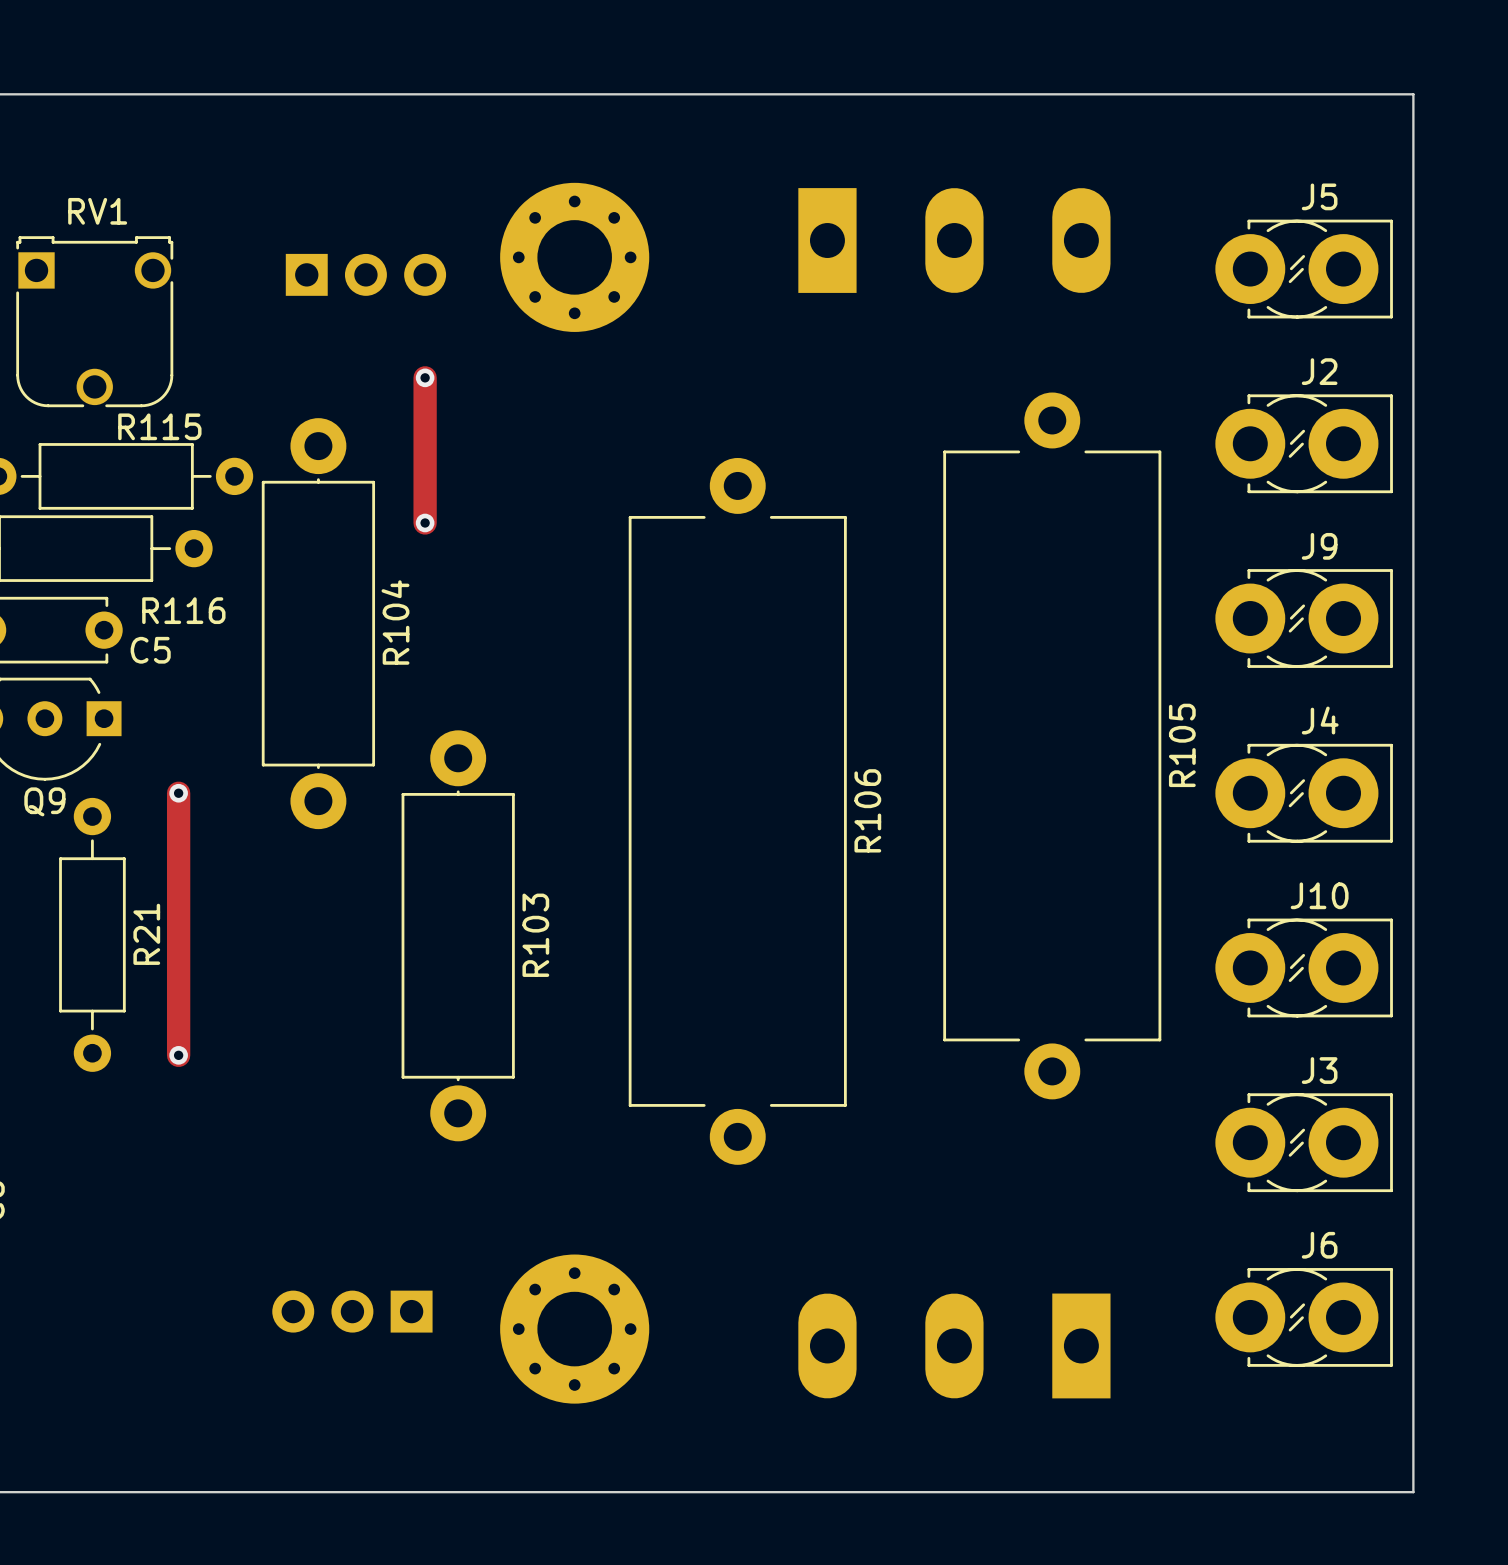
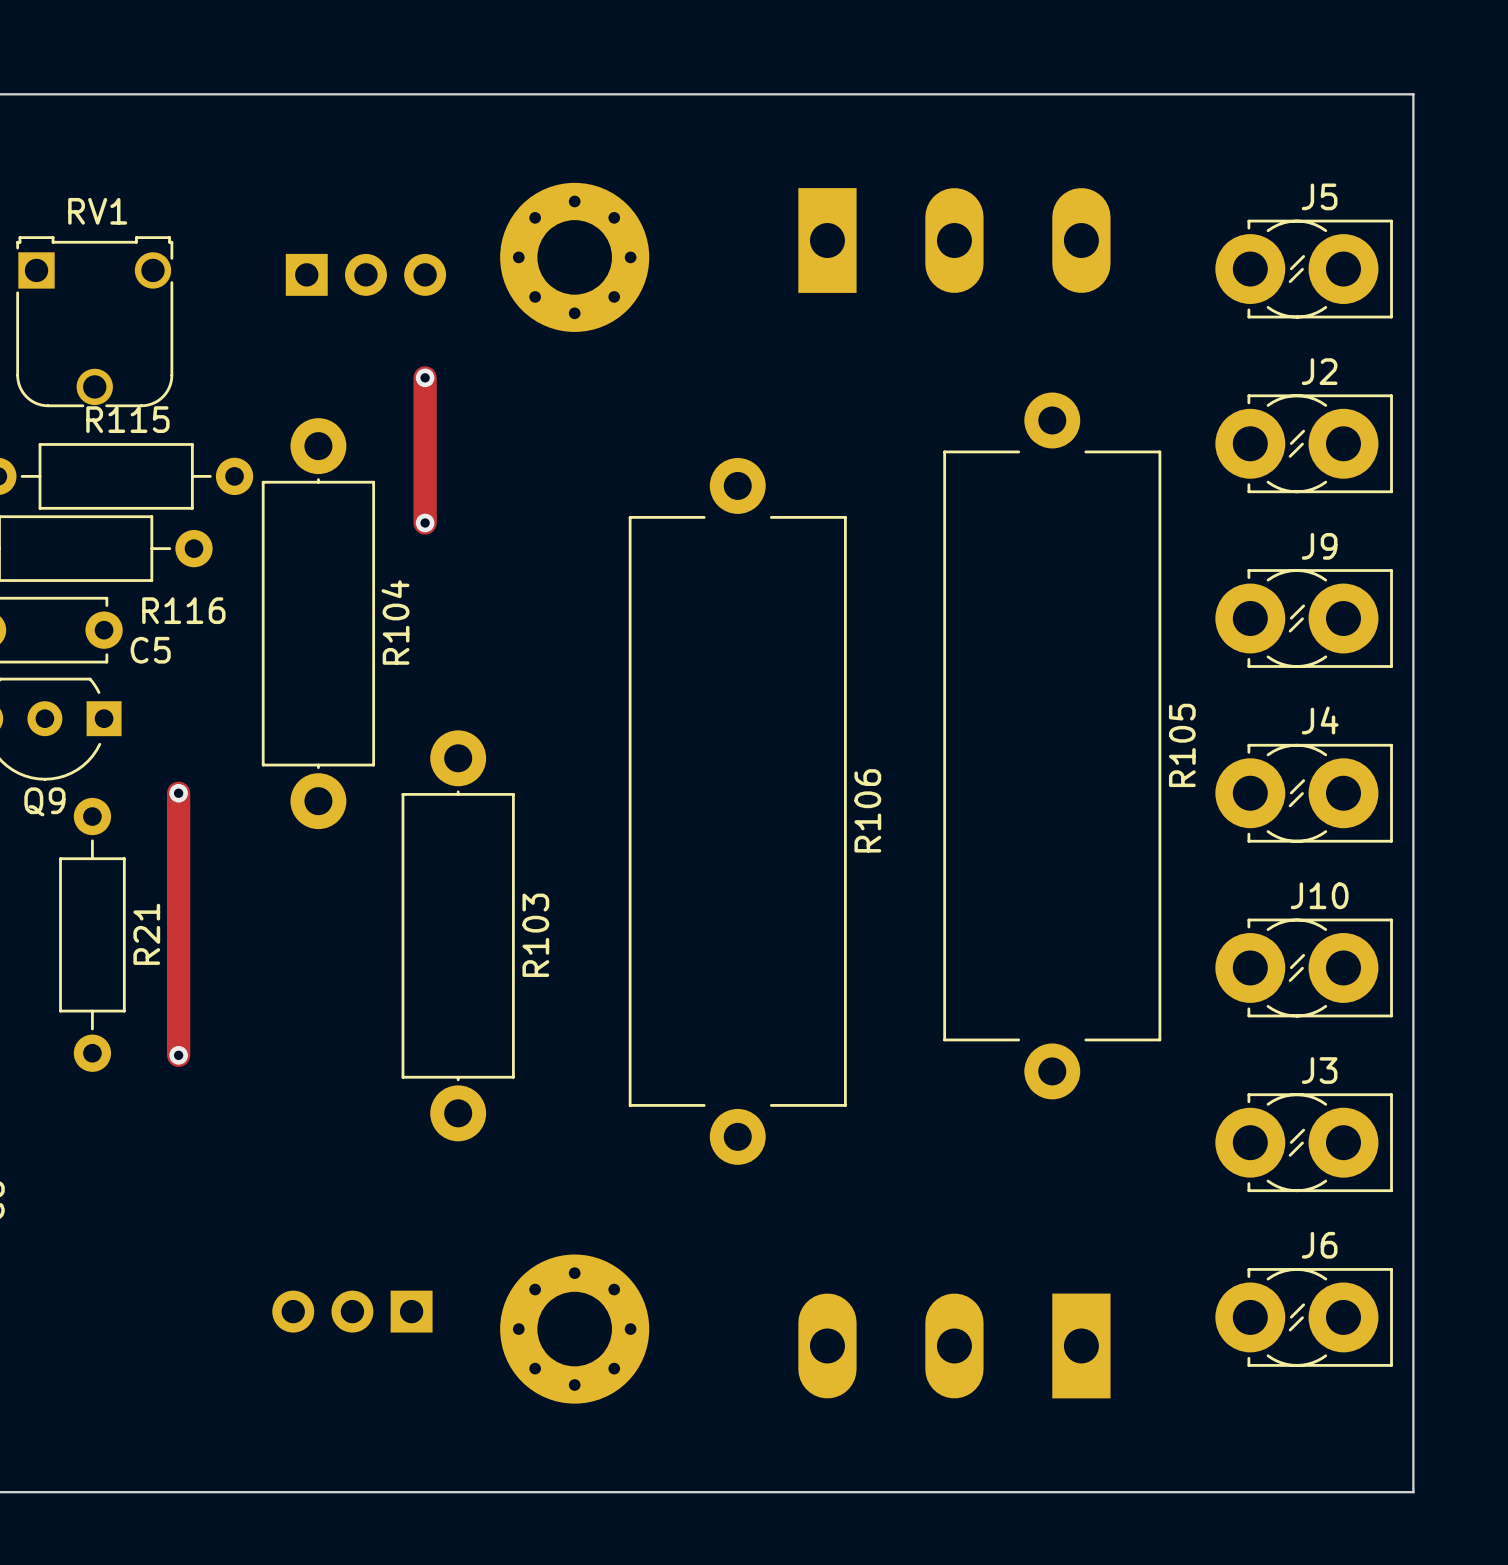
R115 name position: R115 (159, 426) -> R115 (127, 419)

